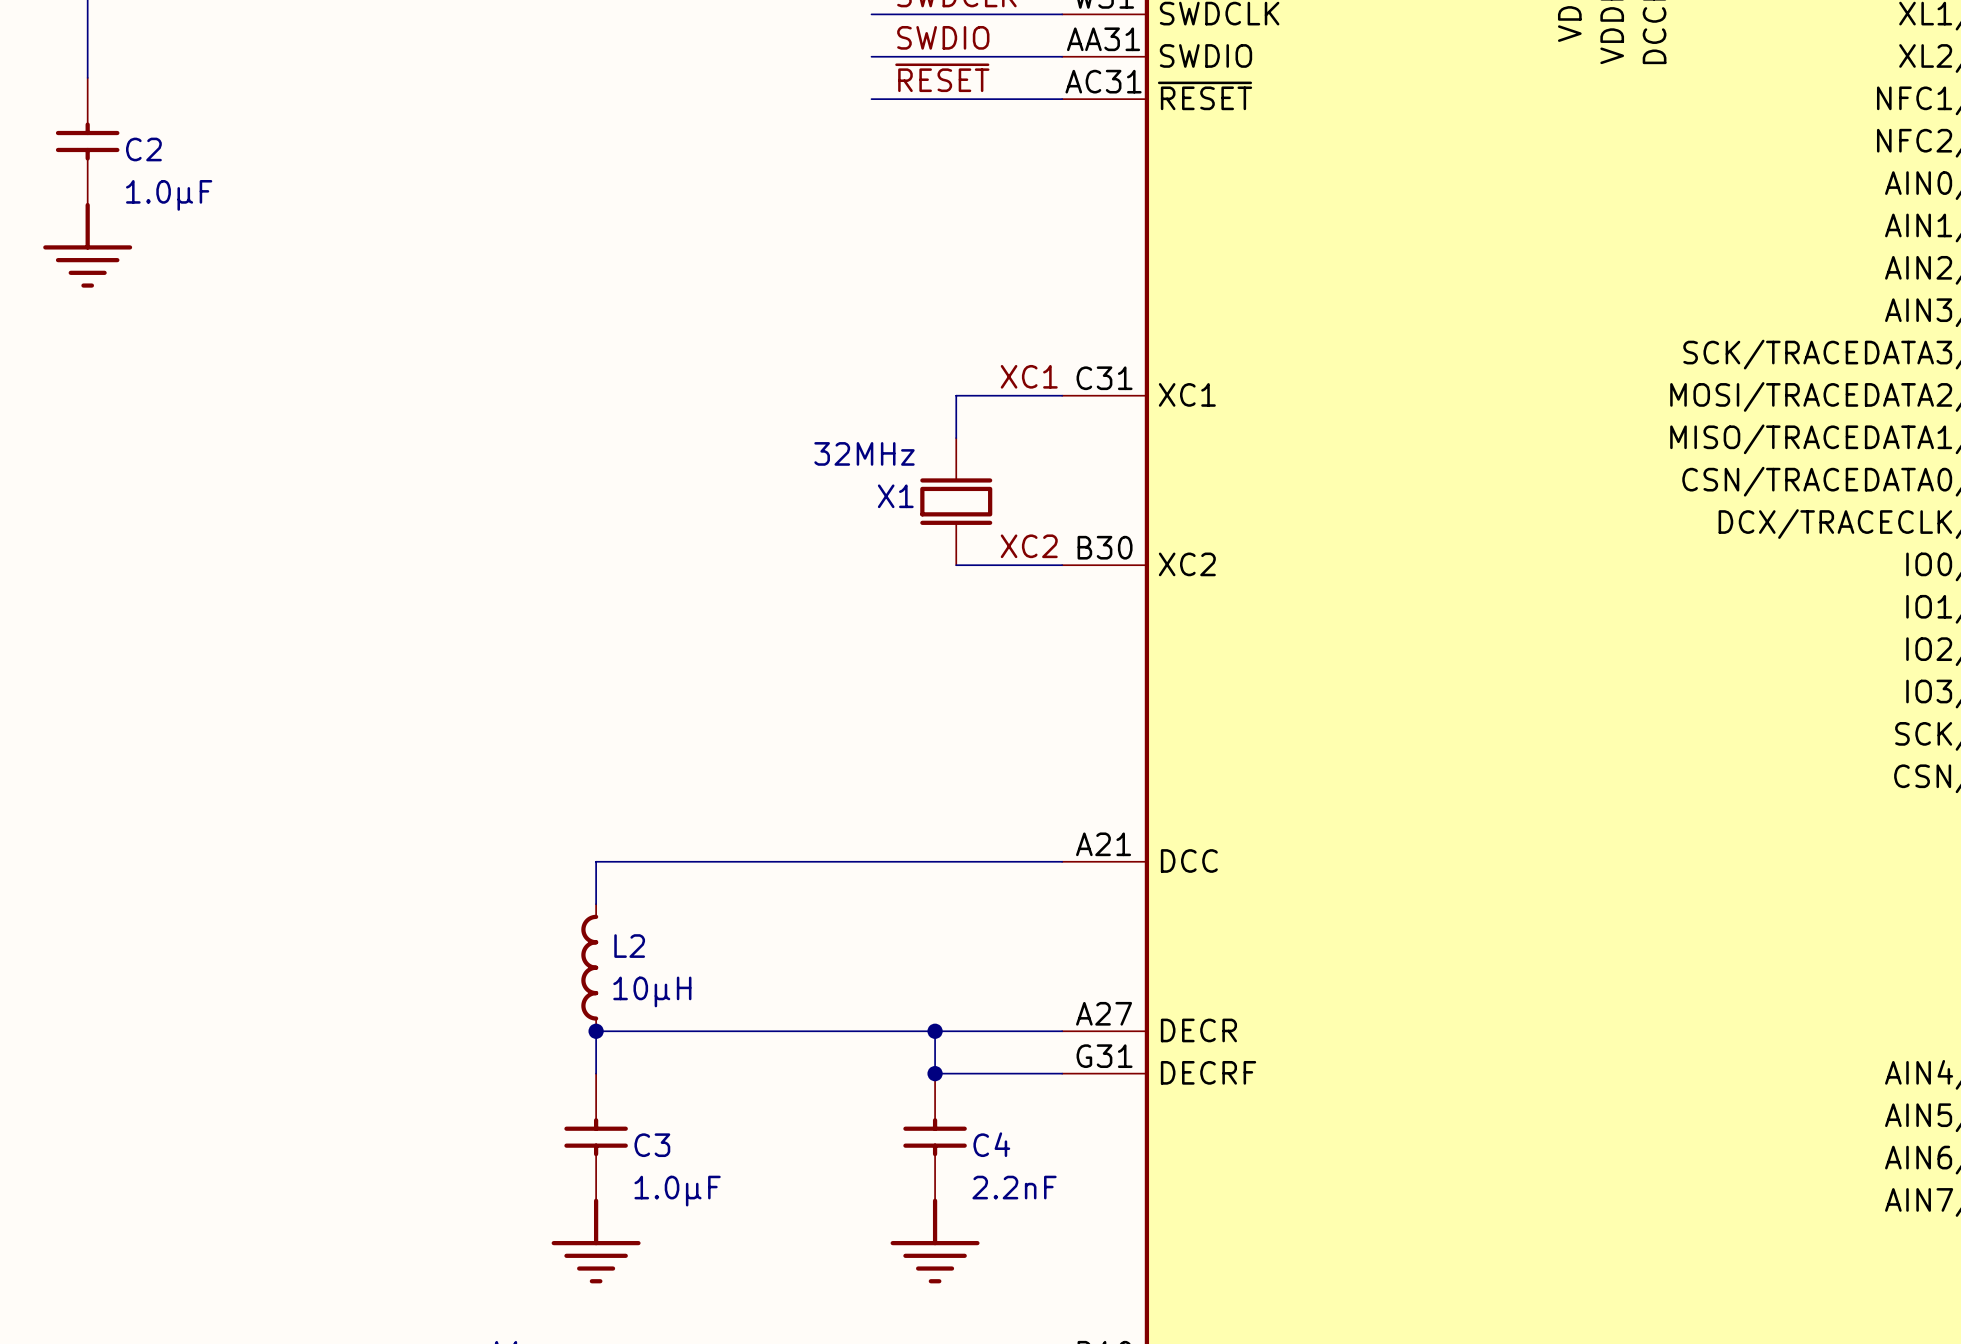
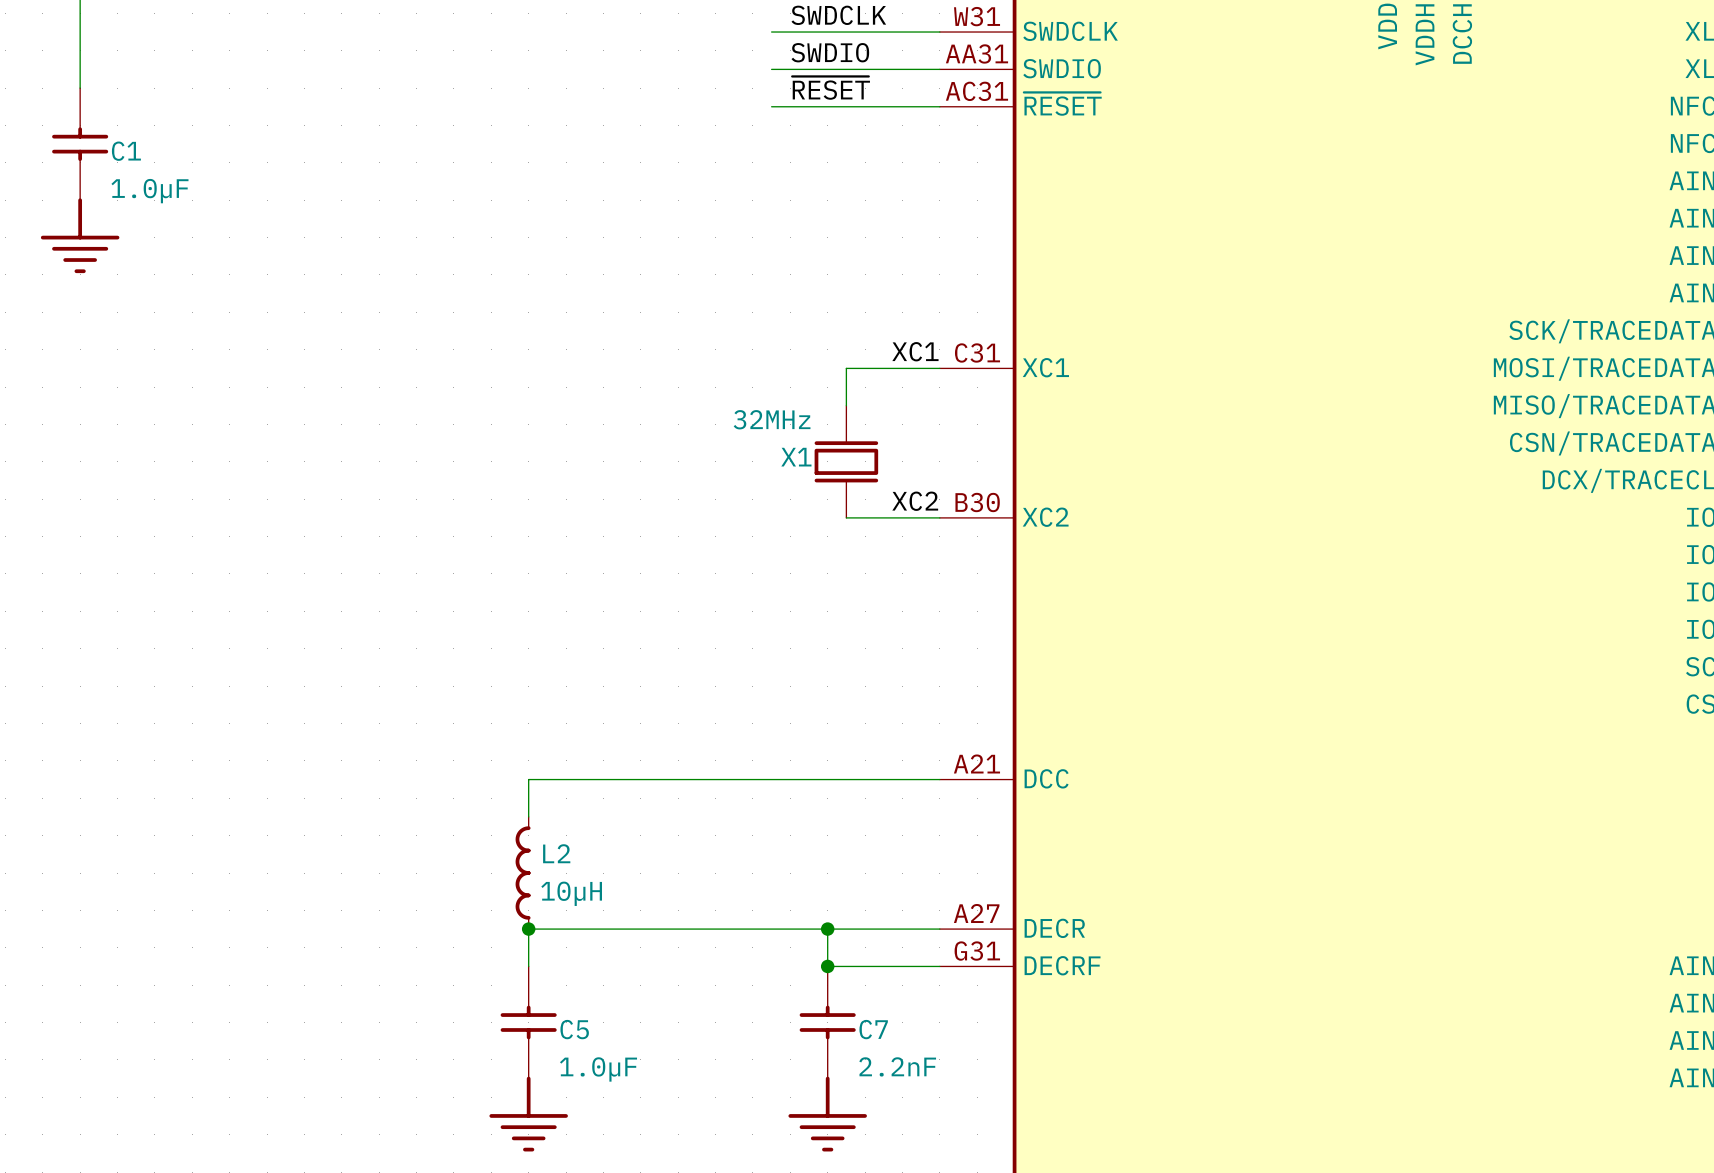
C2 name: C2 (143, 149) -> C1 (126, 151)
C4 name: C4 (991, 1144) -> C7 (873, 1029)
C3 name: C3 (652, 1145) -> C5 (574, 1029)

